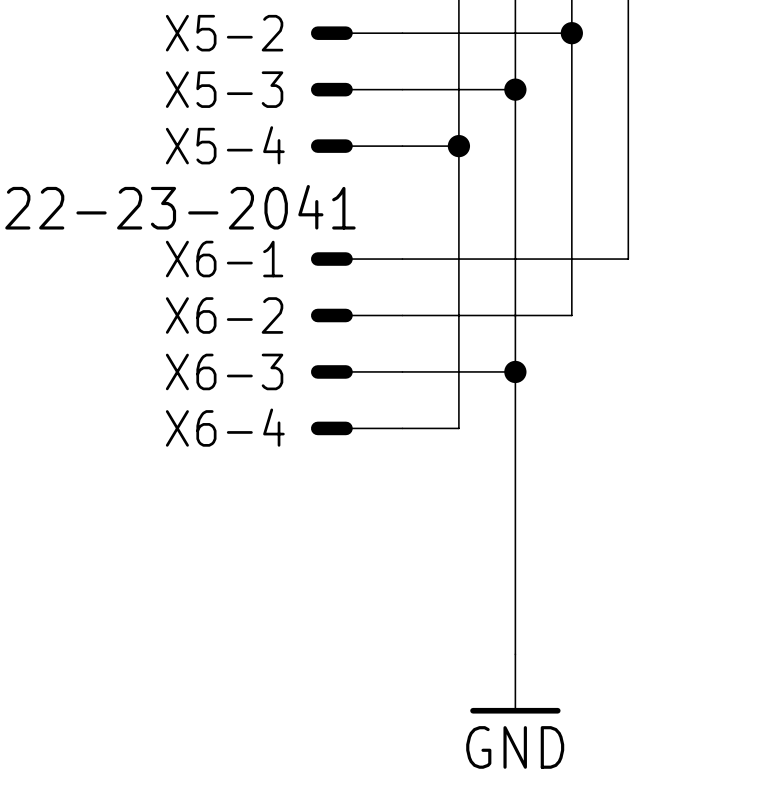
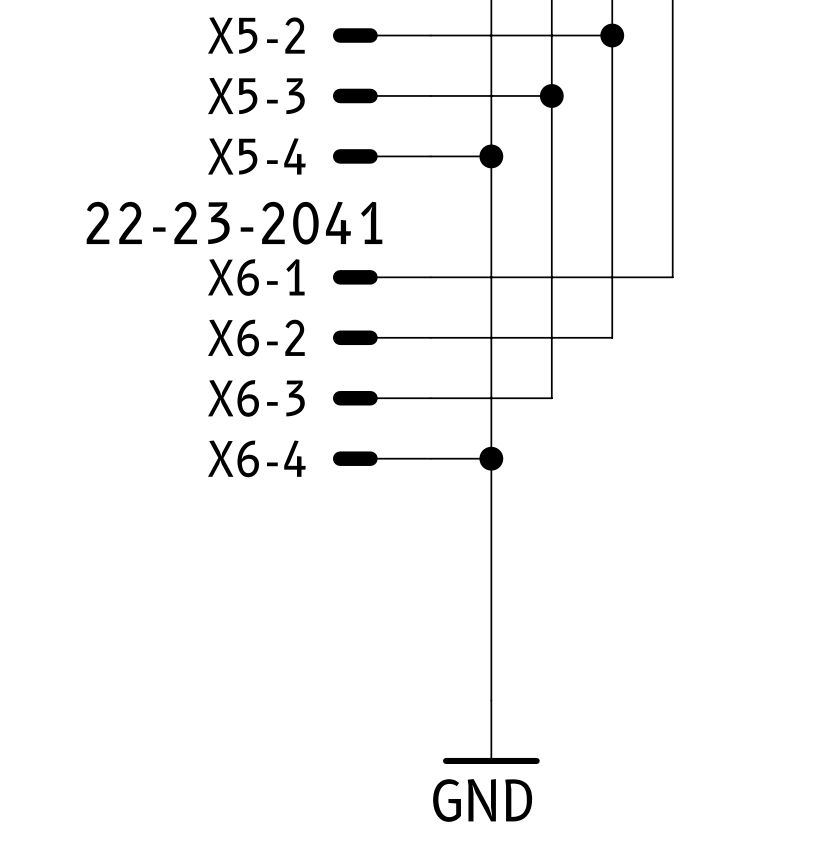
wire: (515, 371) (515, 654) -> none
junction position: (515, 371) -> (491, 458)
wire: none -> (491, 458) (491, 700)
power symbol position: GND (515, 683) -> GND (491, 732)

